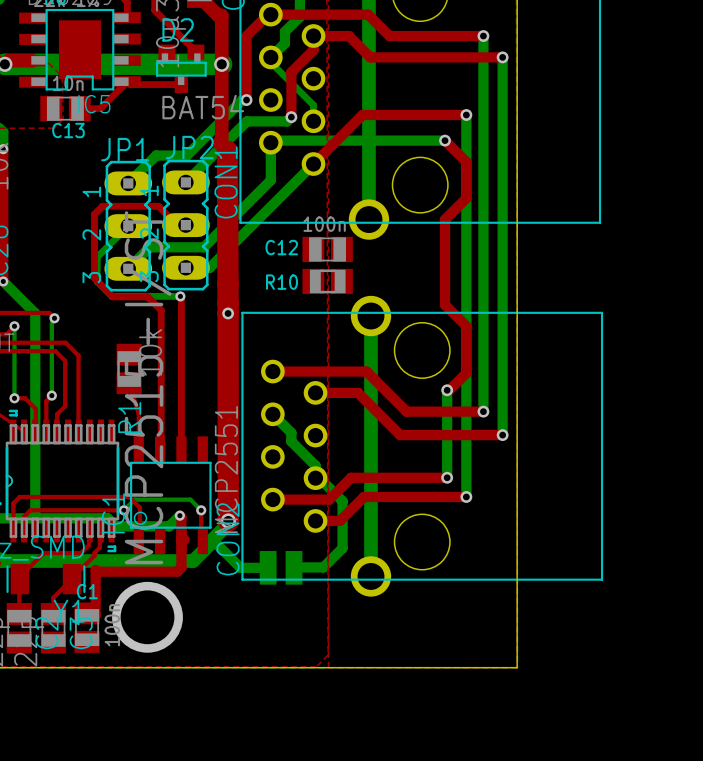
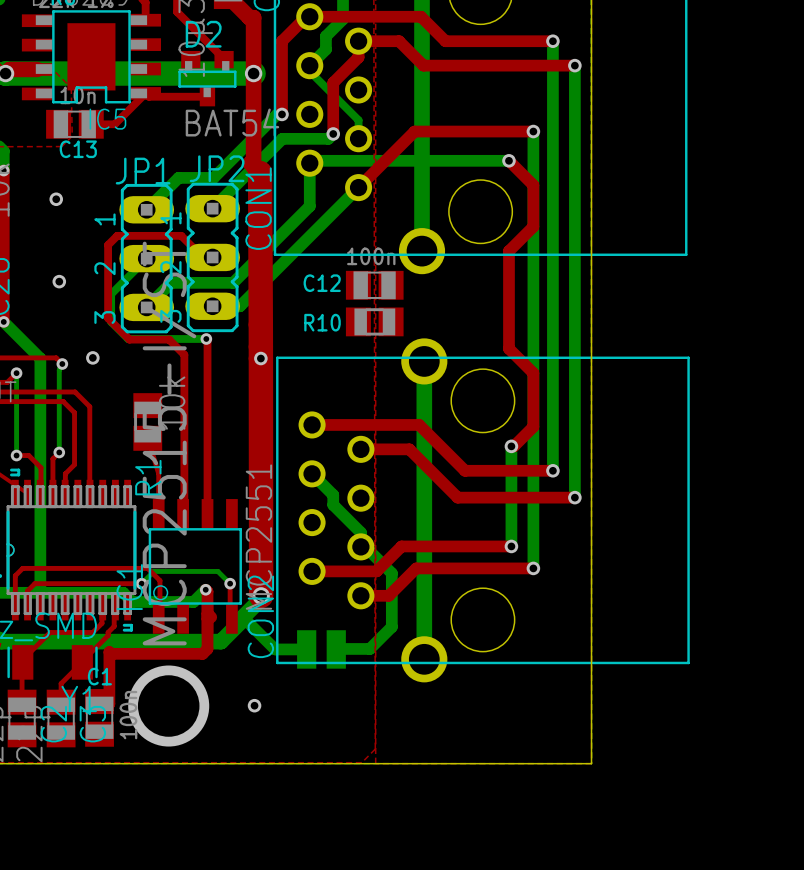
via: none -> (56, 199)
via: none -> (59, 281)
via: none -> (92, 357)
via: none -> (254, 705)

